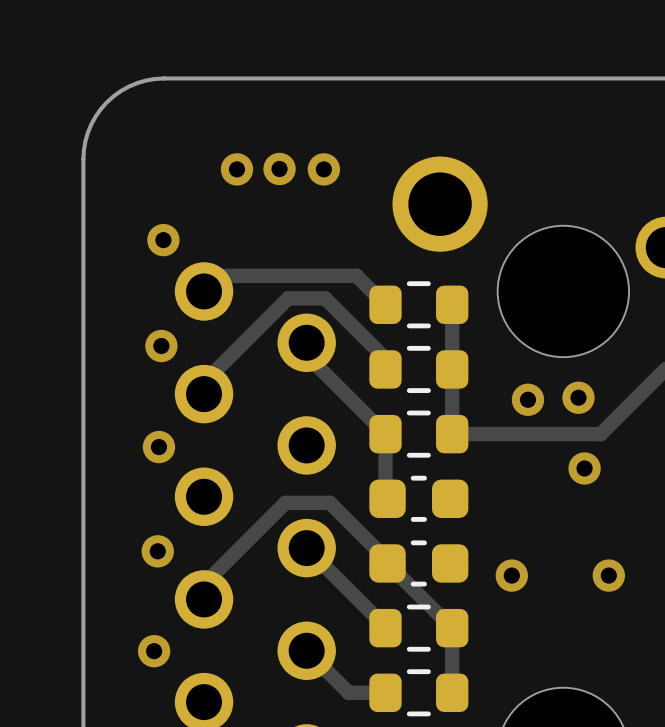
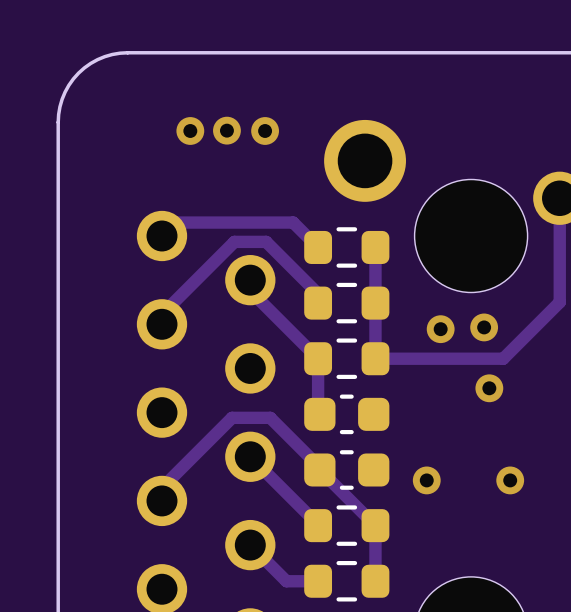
via: (163, 240) -> none
via: (161, 346) -> none
via: (158, 447) -> none
via: (157, 551) -> none
via: (154, 651) -> none

